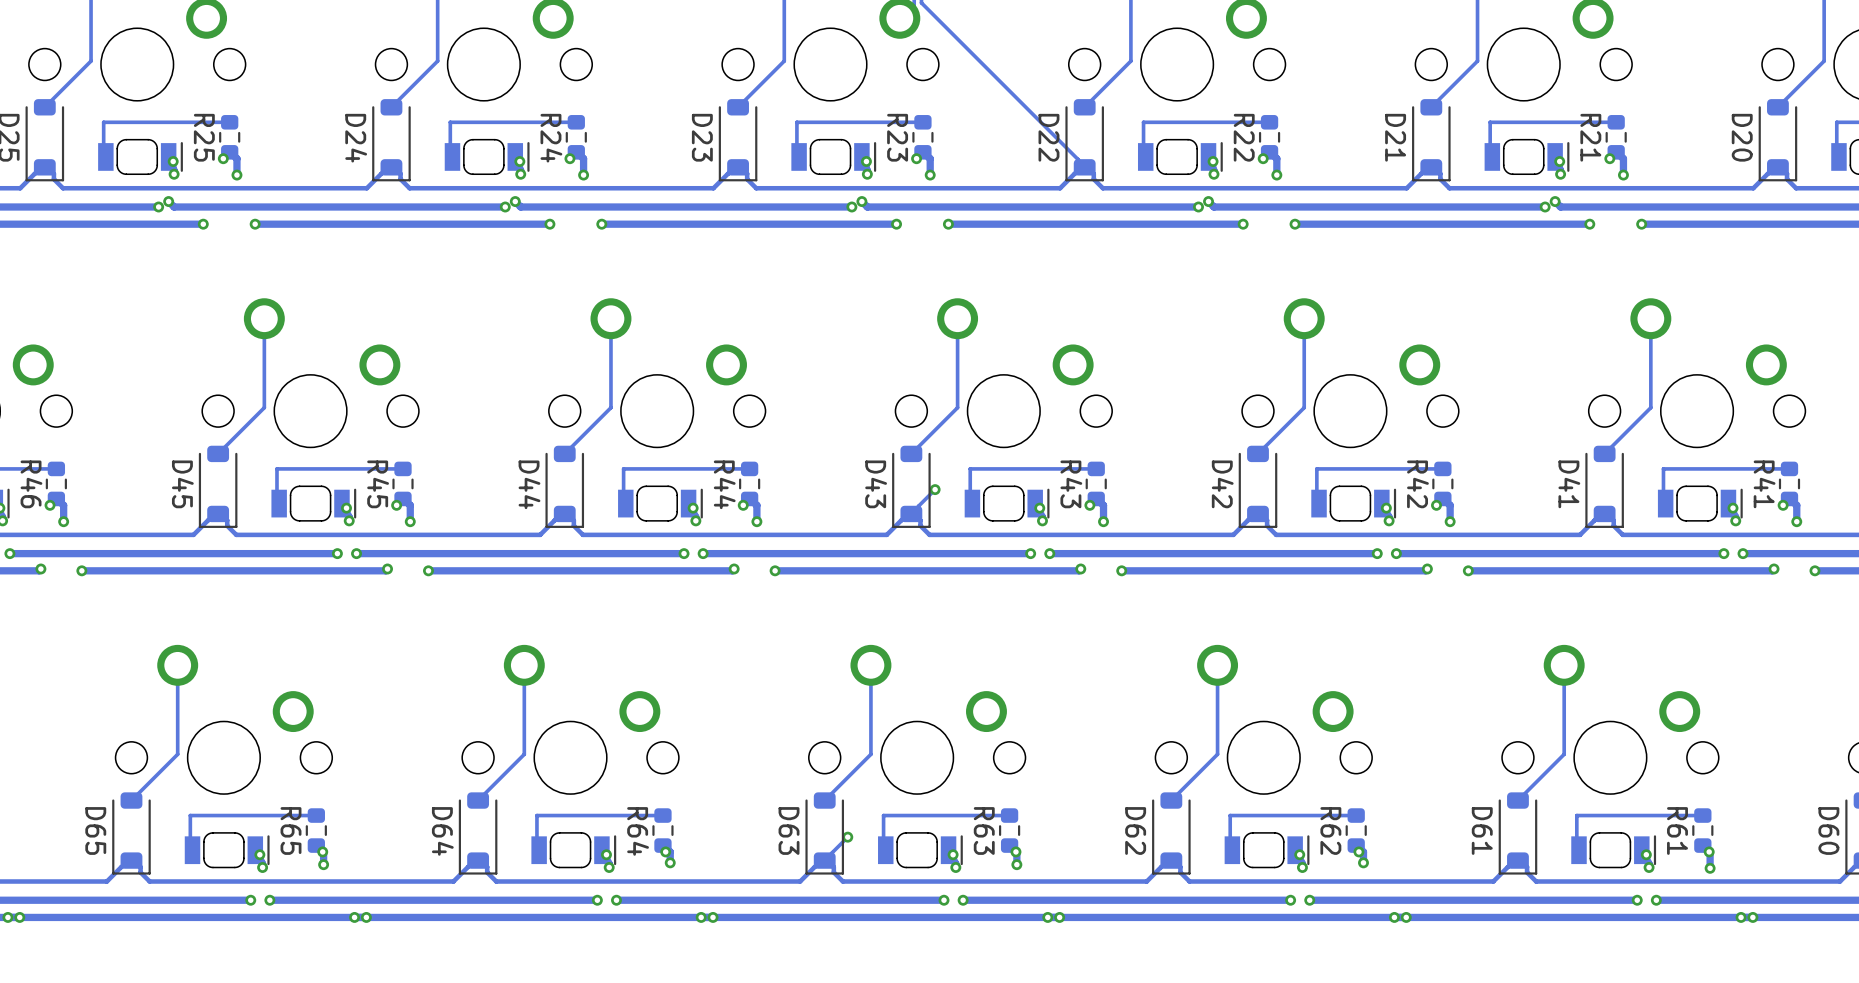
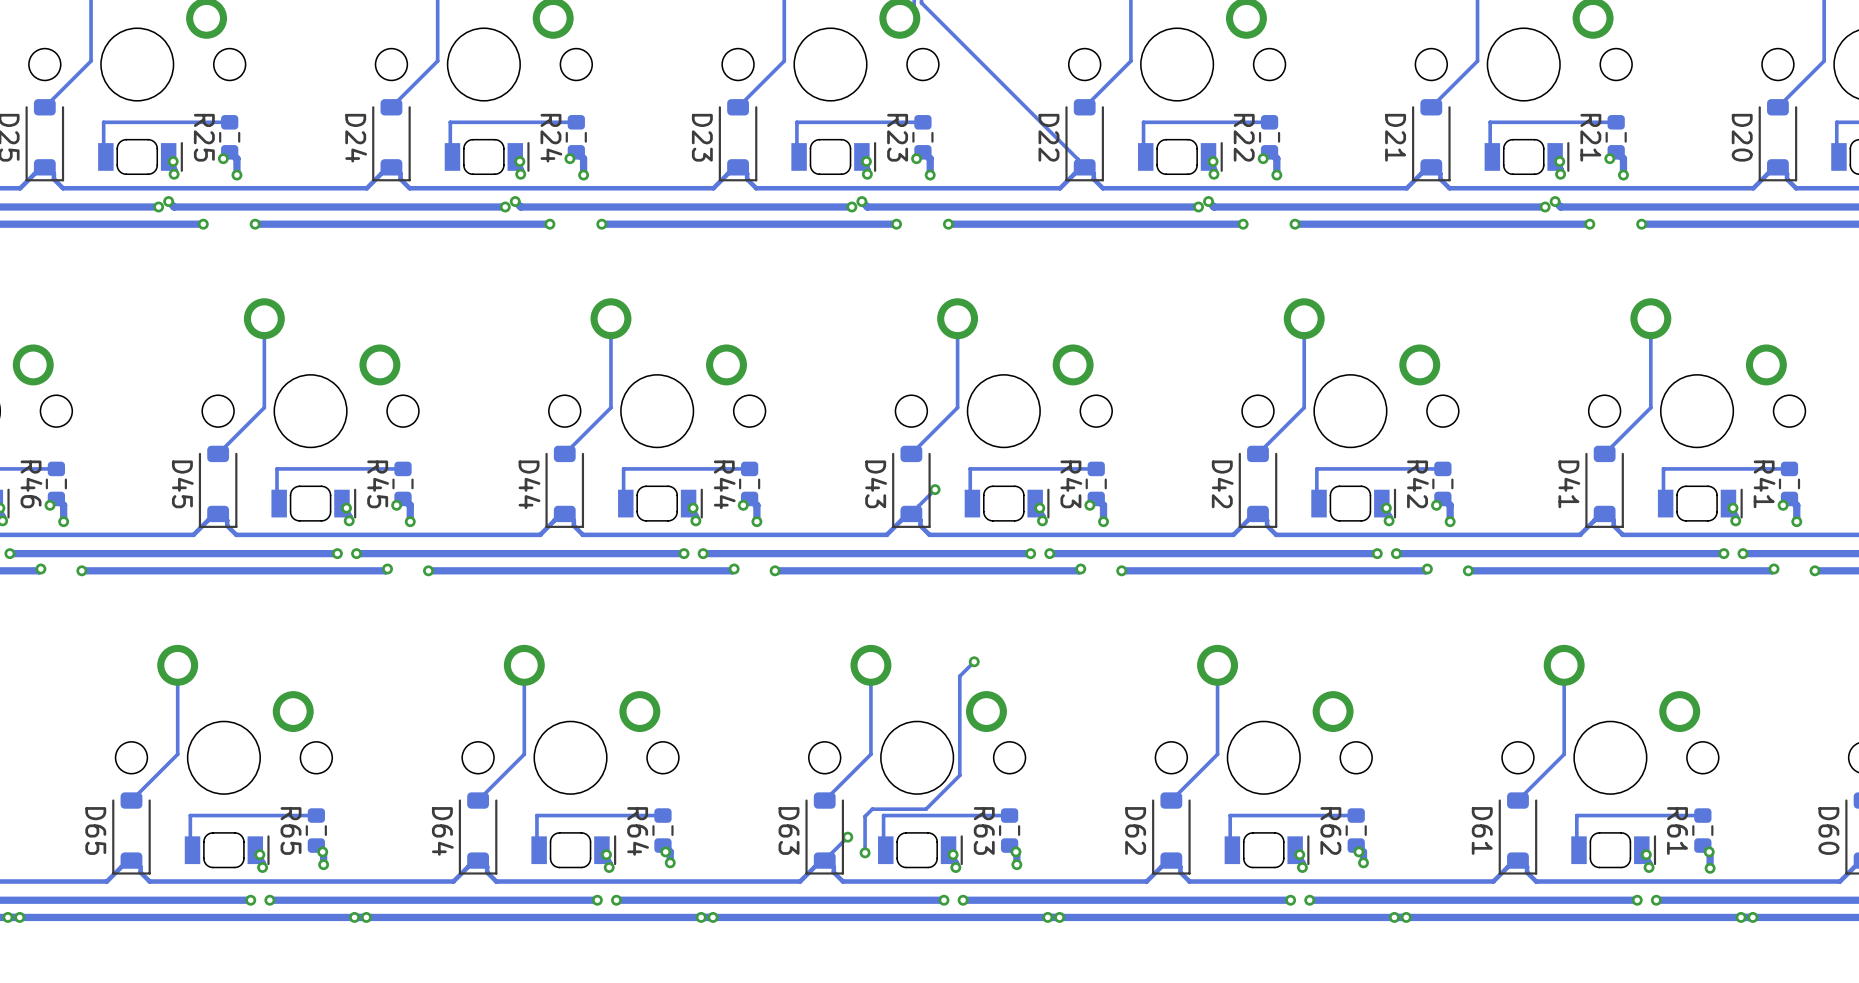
track: none -> (974, 661) (959, 676) (959, 775) (926, 809) (872, 809) (865, 816) (865, 852)
via: none -> (974, 661)
via: none -> (865, 852)

